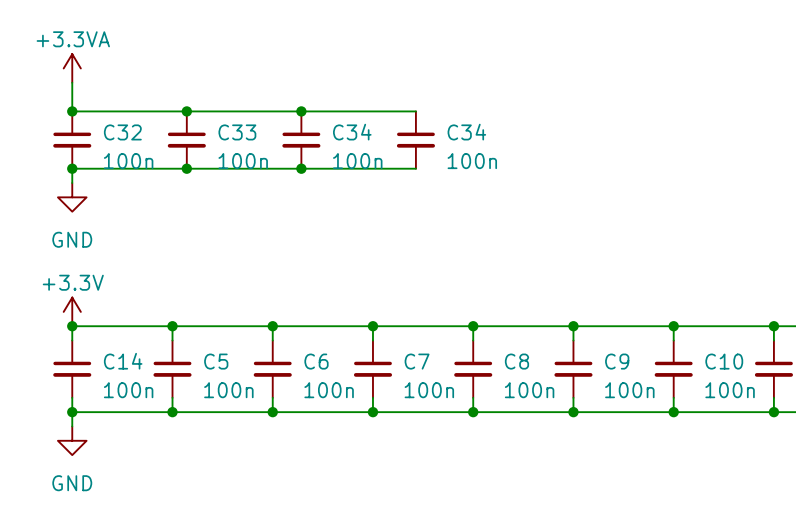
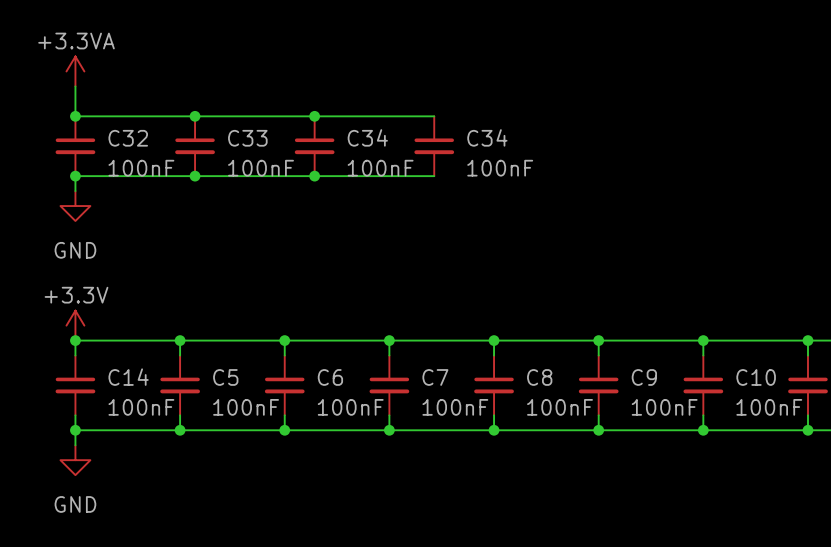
C32 value: 100n (128, 161) -> 100nF (141, 168)
C33 value: 100n (243, 161) -> 100nF (261, 168)
C34 value: 100n (357, 161) -> 100nF (380, 168)
C34 value: 100n (472, 161) -> 100nF (500, 168)
C14 value: 100n (128, 390) -> 100nF (141, 407)
C5 value: 100n (228, 390) -> 100nF (246, 407)
C6 value: 100n (329, 390) -> 100nF (350, 407)
C7 value: 100n (429, 390) -> 100nF (455, 407)
C8 value: 100n (529, 390) -> 100nF (560, 407)
C9 value: 100n (629, 390) -> 100nF (664, 407)
C10 value: 100n (730, 390) -> 100nF (769, 407)

